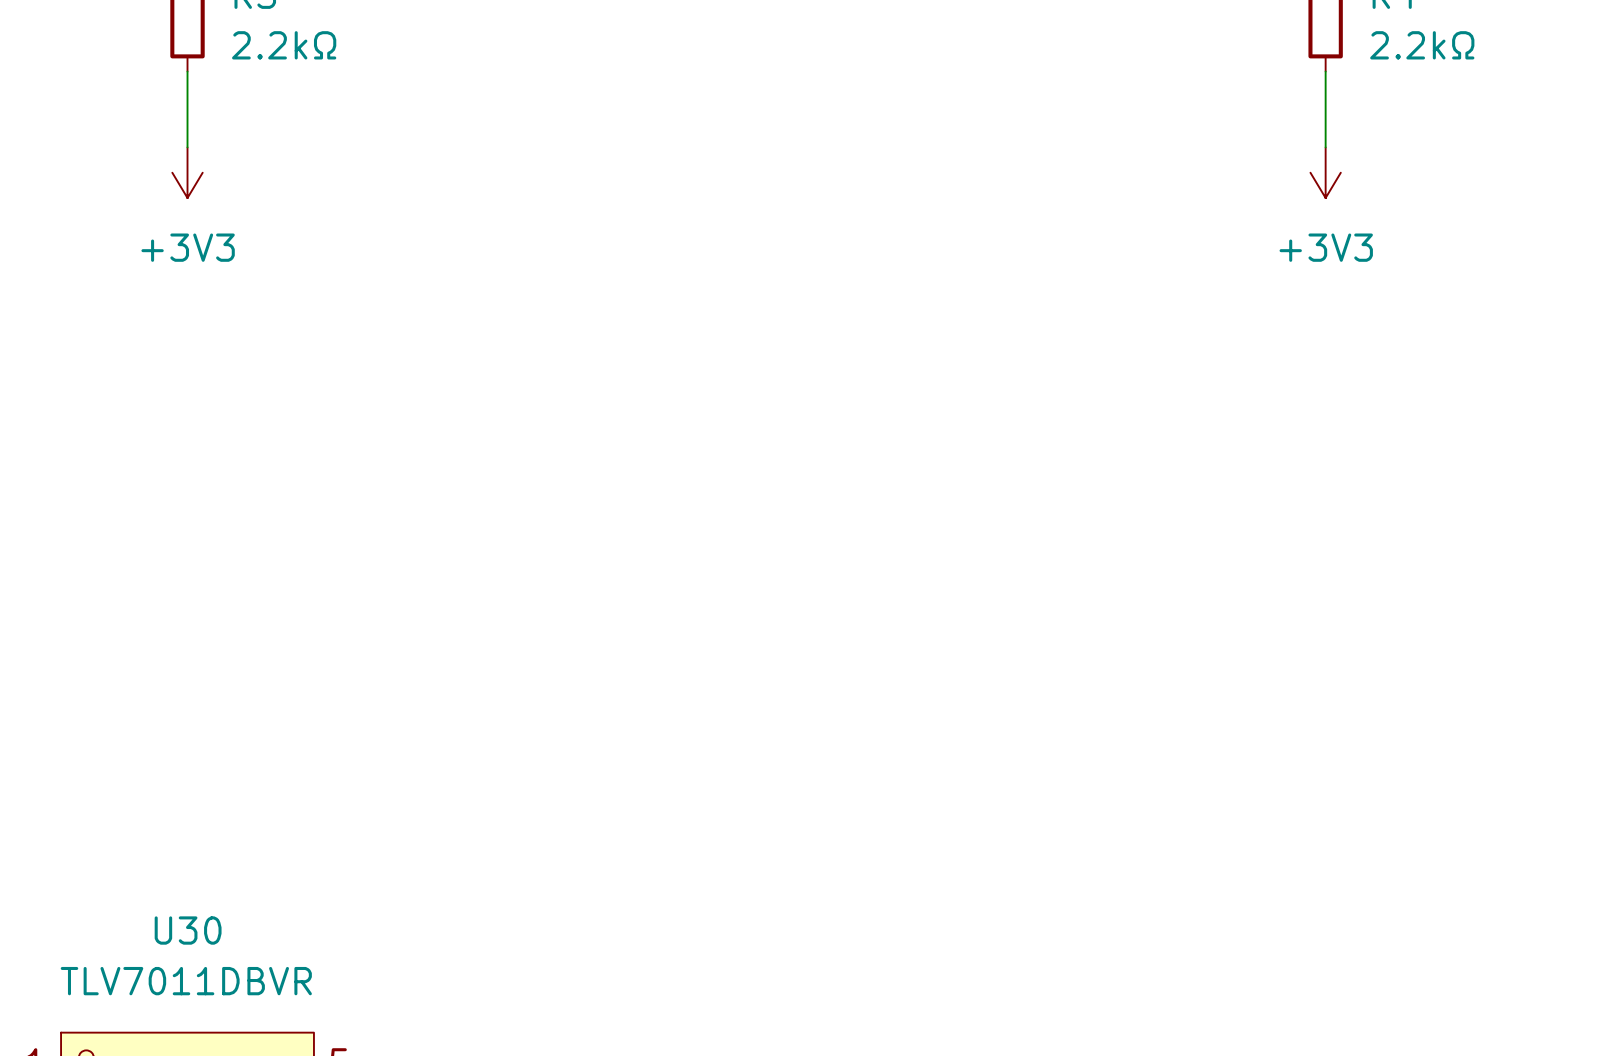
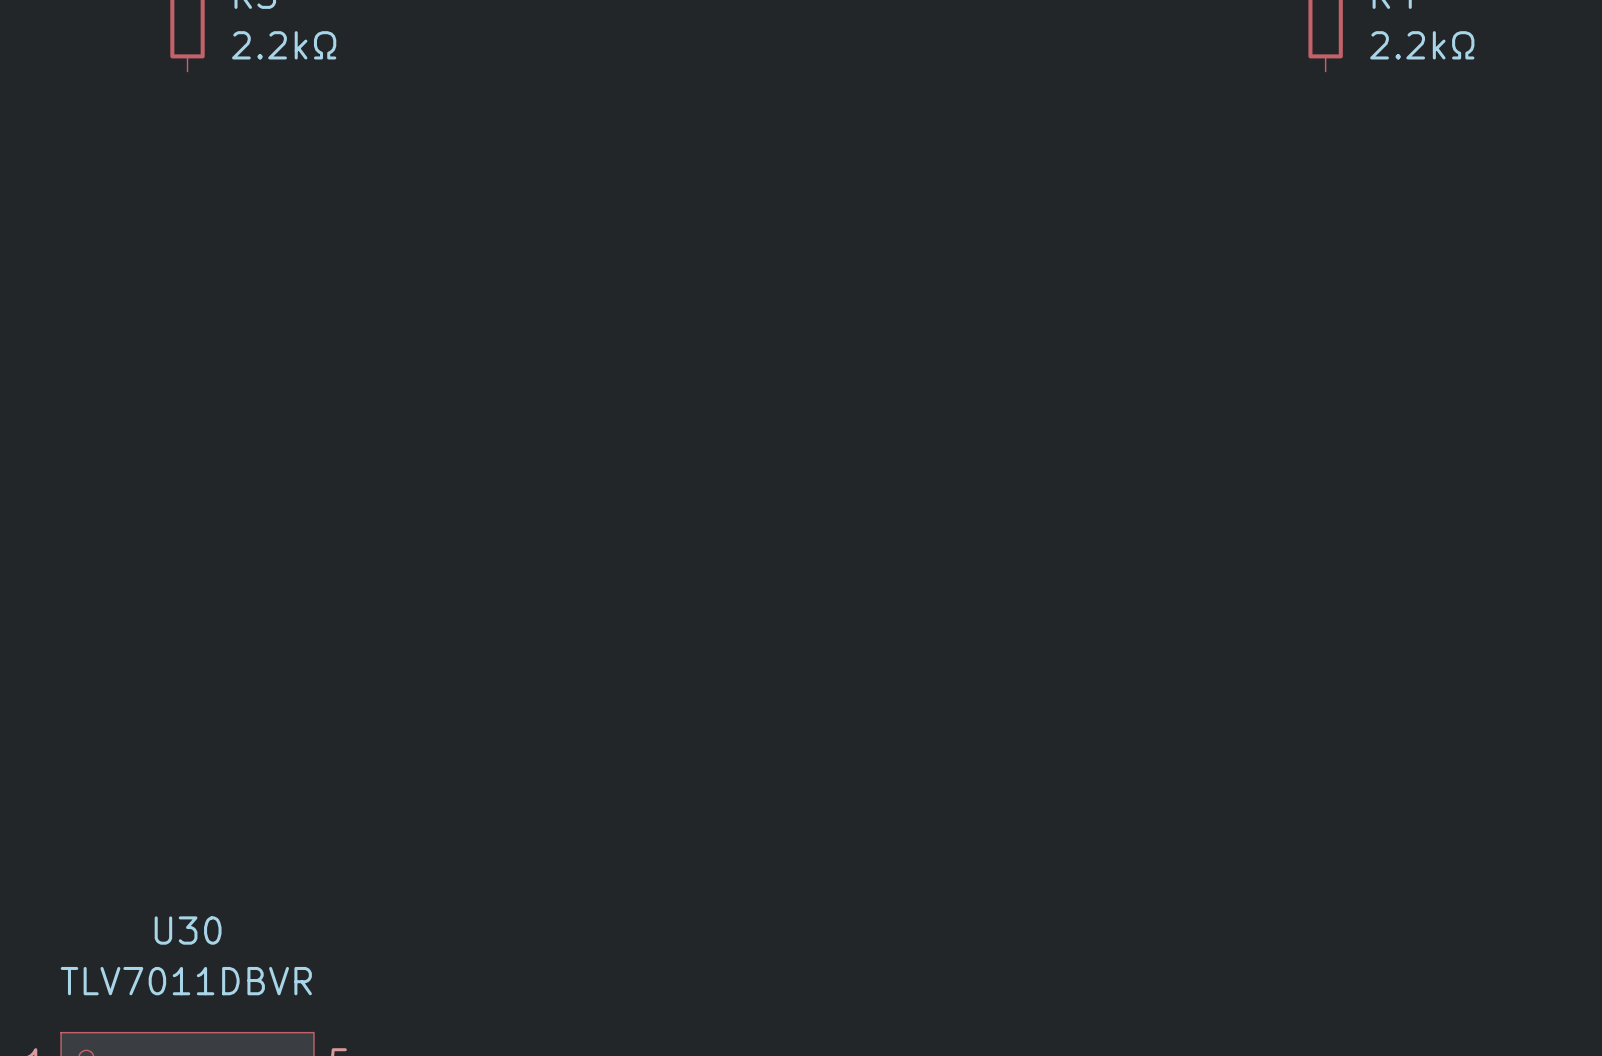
wire: (187, 71) (187, 147) -> none
wire: (1325, 71) (1325, 147) -> none
power symbol: +3V3 (187, 172) -> none
power symbol: +3V3 (1325, 172) -> none

